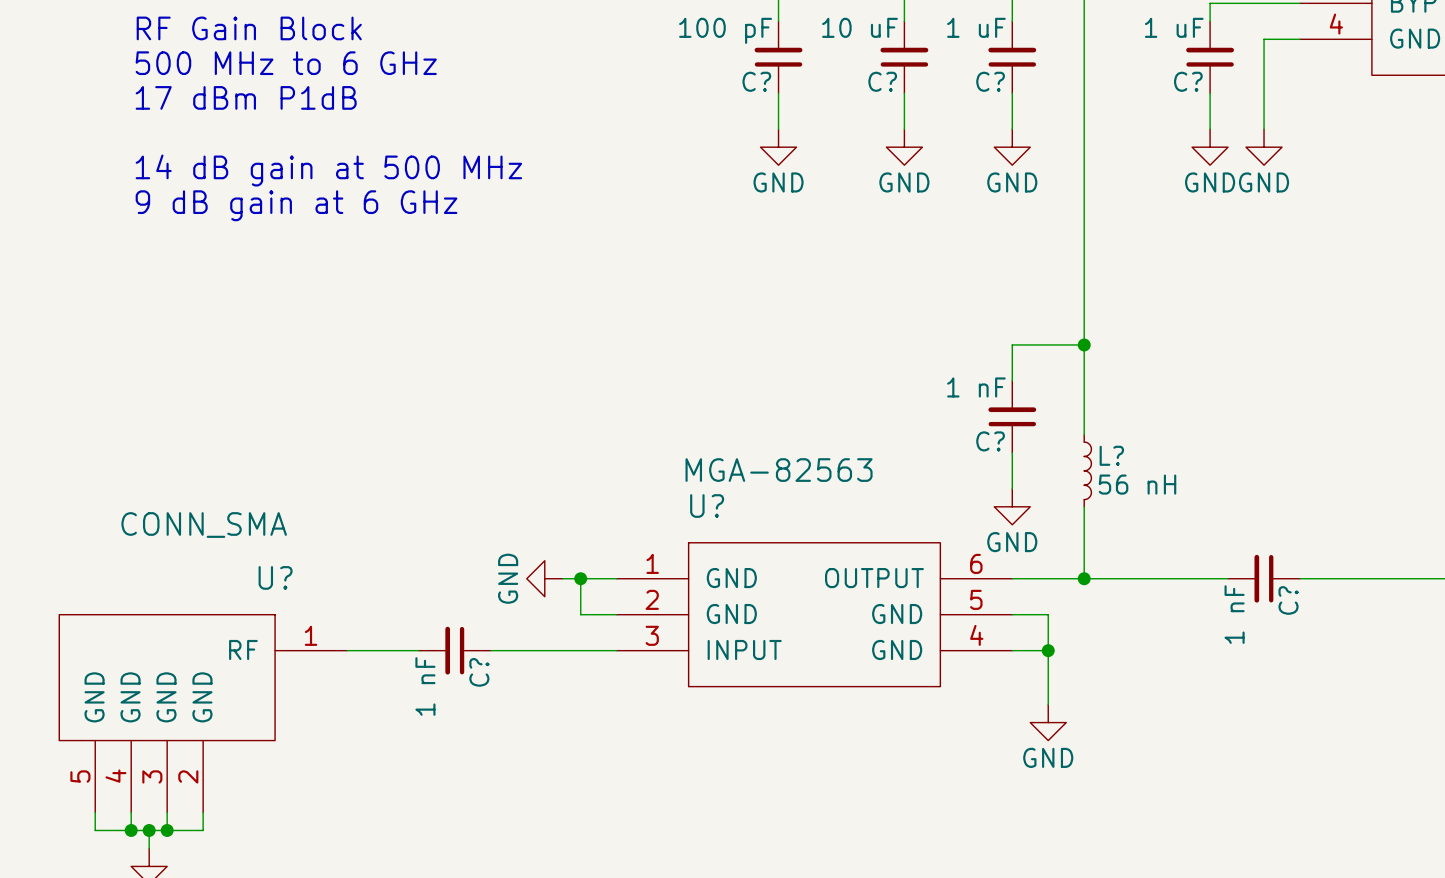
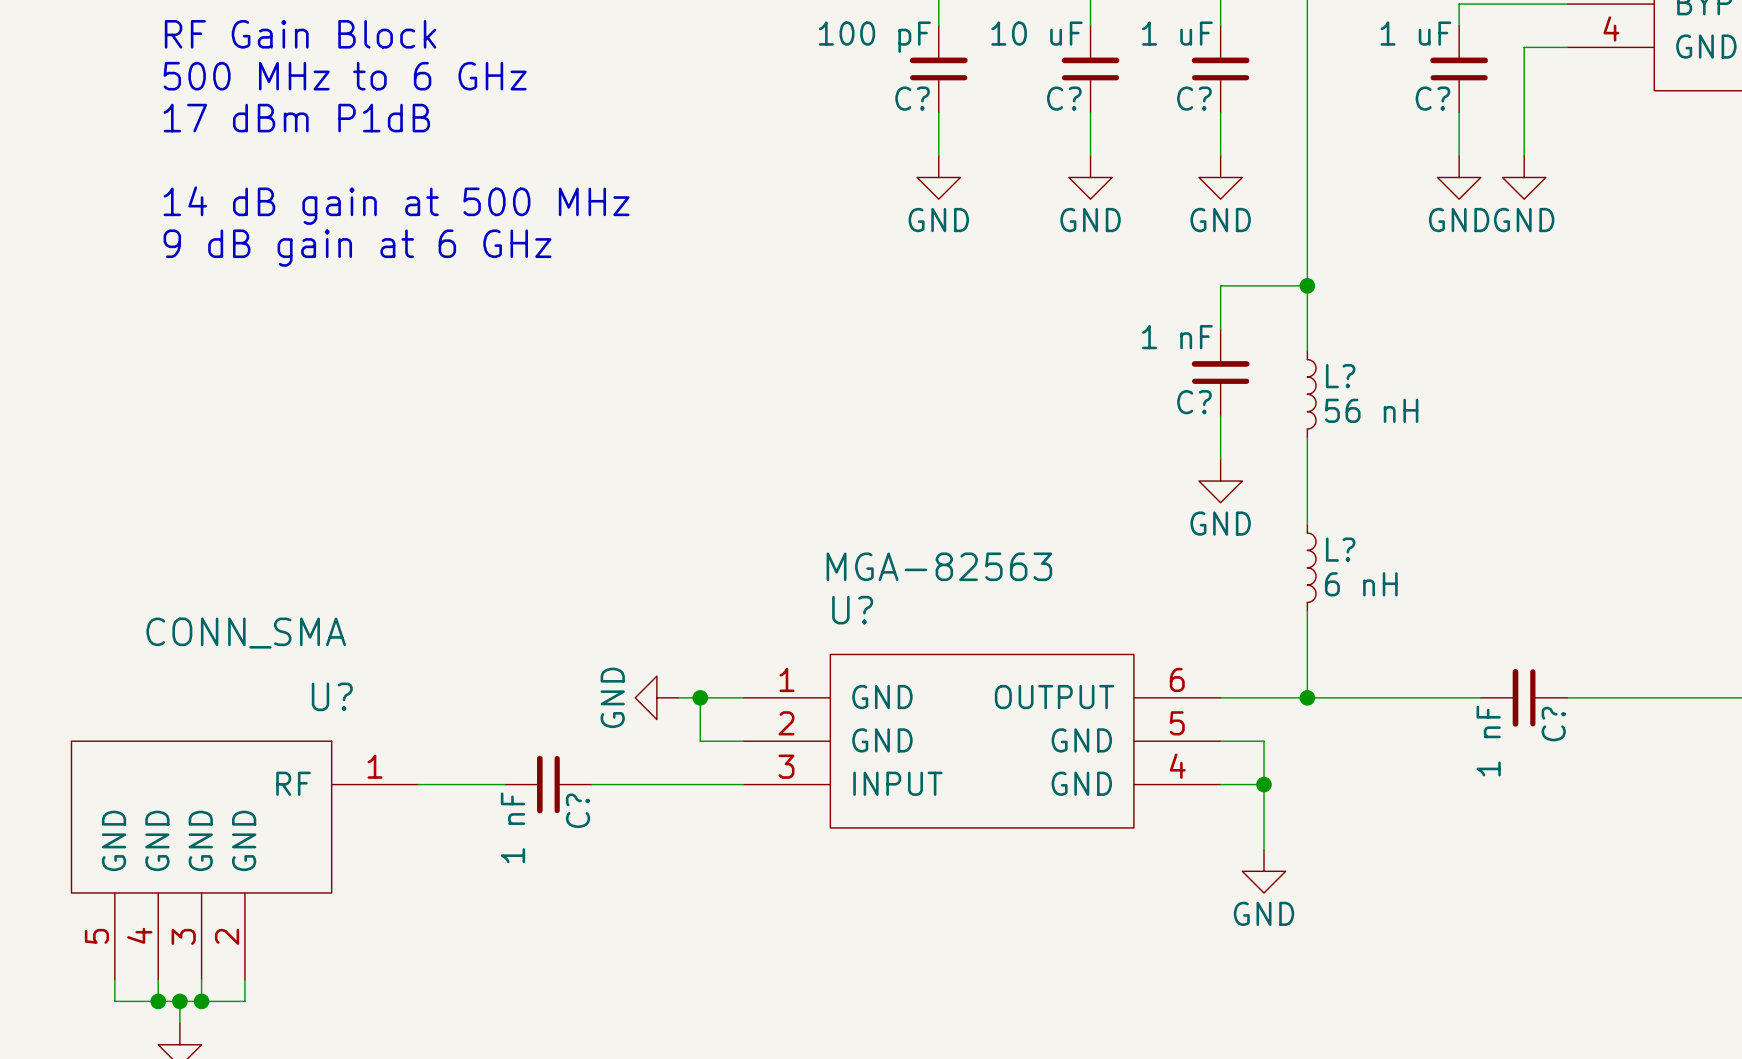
wire: none -> (1307, 285) (1220, 285) (1220, 329)
junction: none -> (1307, 285)
wire: (1084, 291) (1084, 362) -> none
L?: none -> 56 nH (1311, 394)
wire: (1012, 344) (1084, 344) -> none
junction: (1084, 344) -> none
C? position: (1012, 416) -> (1220, 372)
wire: (1012, 452) (1012, 488) -> none
L? value: 56 nH (1137, 484) -> 6 nH (1361, 584)
power symbol position: GND (1012, 506) -> GND (1220, 481)

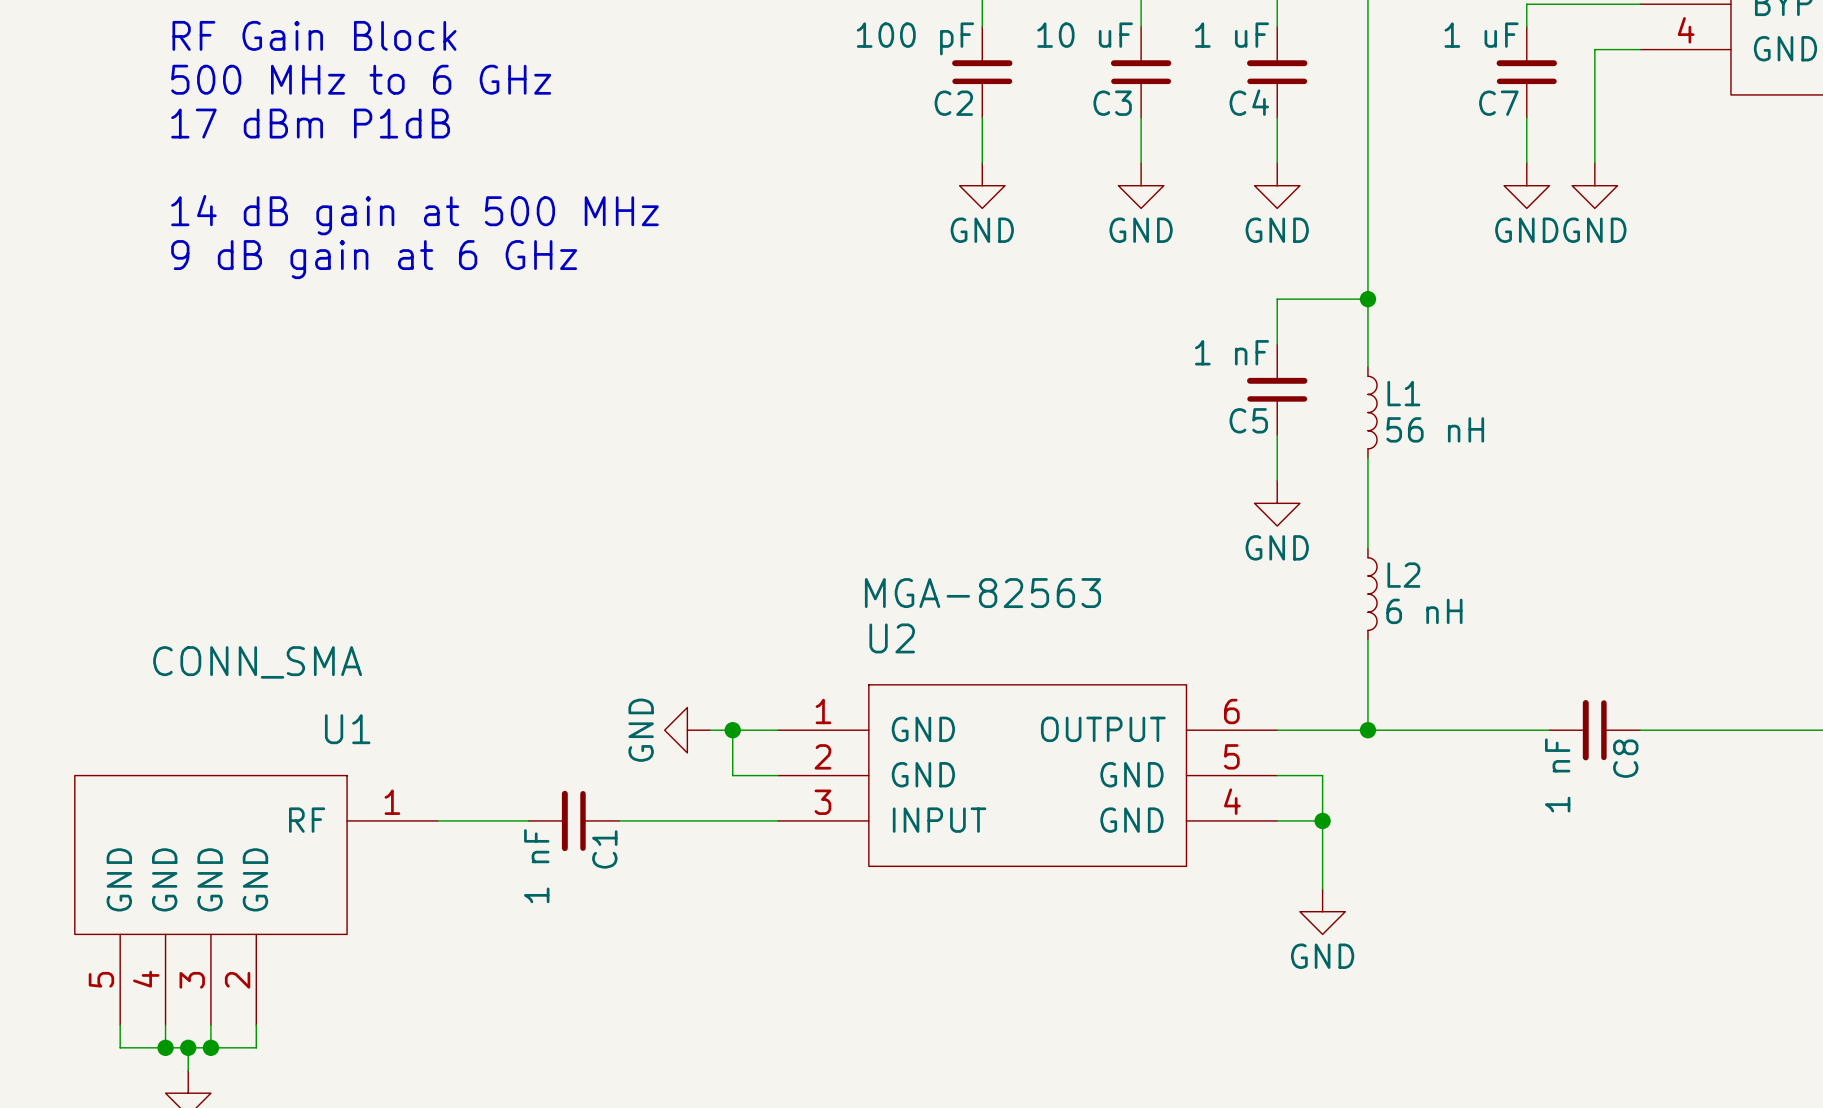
C? name: C? (912, 98) -> C2 (953, 103)
C? name: C? (1064, 98) -> C3 (1112, 103)
C? name: C? (1194, 98) -> C4 (1249, 102)
C? name: C? (1432, 98) -> C7 (1498, 103)
L? name: L? (1340, 376) -> L1 (1403, 393)
C? name: C? (1194, 402) -> C5 (1248, 420)
L? name: L? (1340, 549) -> L2 (1403, 575)
U? name: U? (852, 610) -> U2 (892, 638)
U? name: U? (332, 696) -> U1 (347, 729)
C? name: C? (1553, 724) -> C8 (1625, 758)
C? name: C? (578, 810) -> C1 (604, 849)

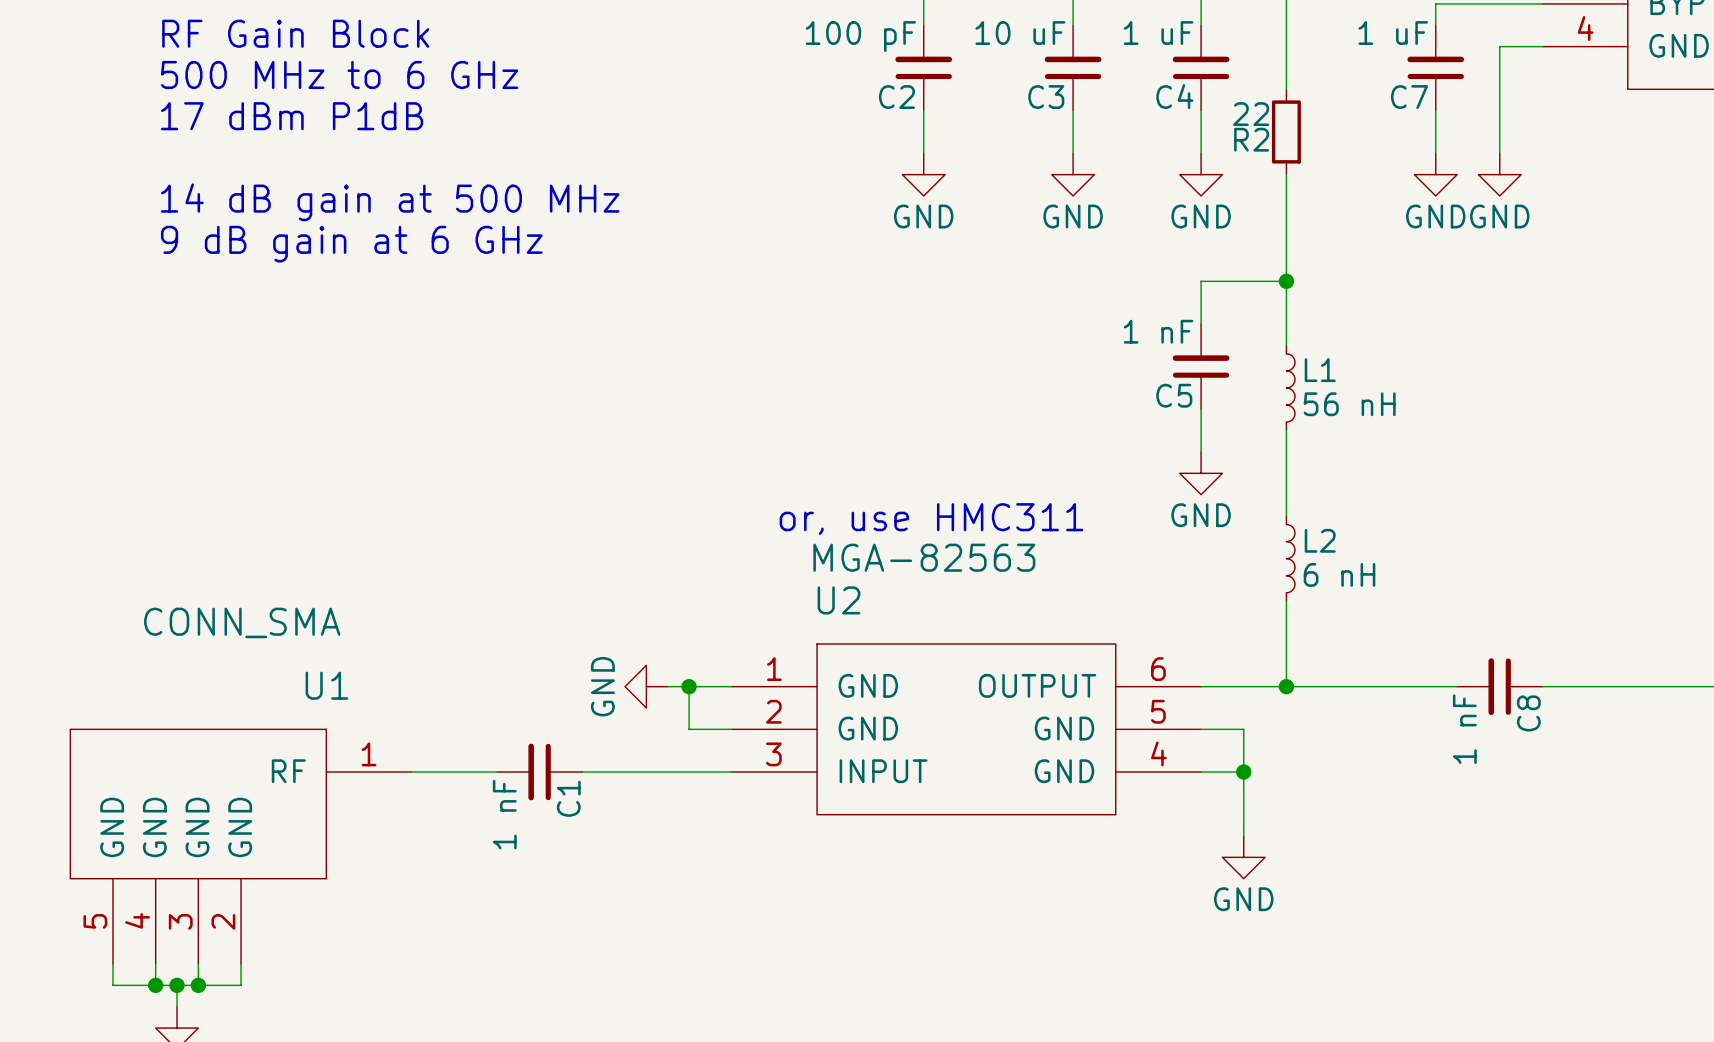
wire: (1367, 94) (1367, 185) -> none
R2: none -> 22 (1286, 131)
text: none -> or, use HMC311 (931, 519)

